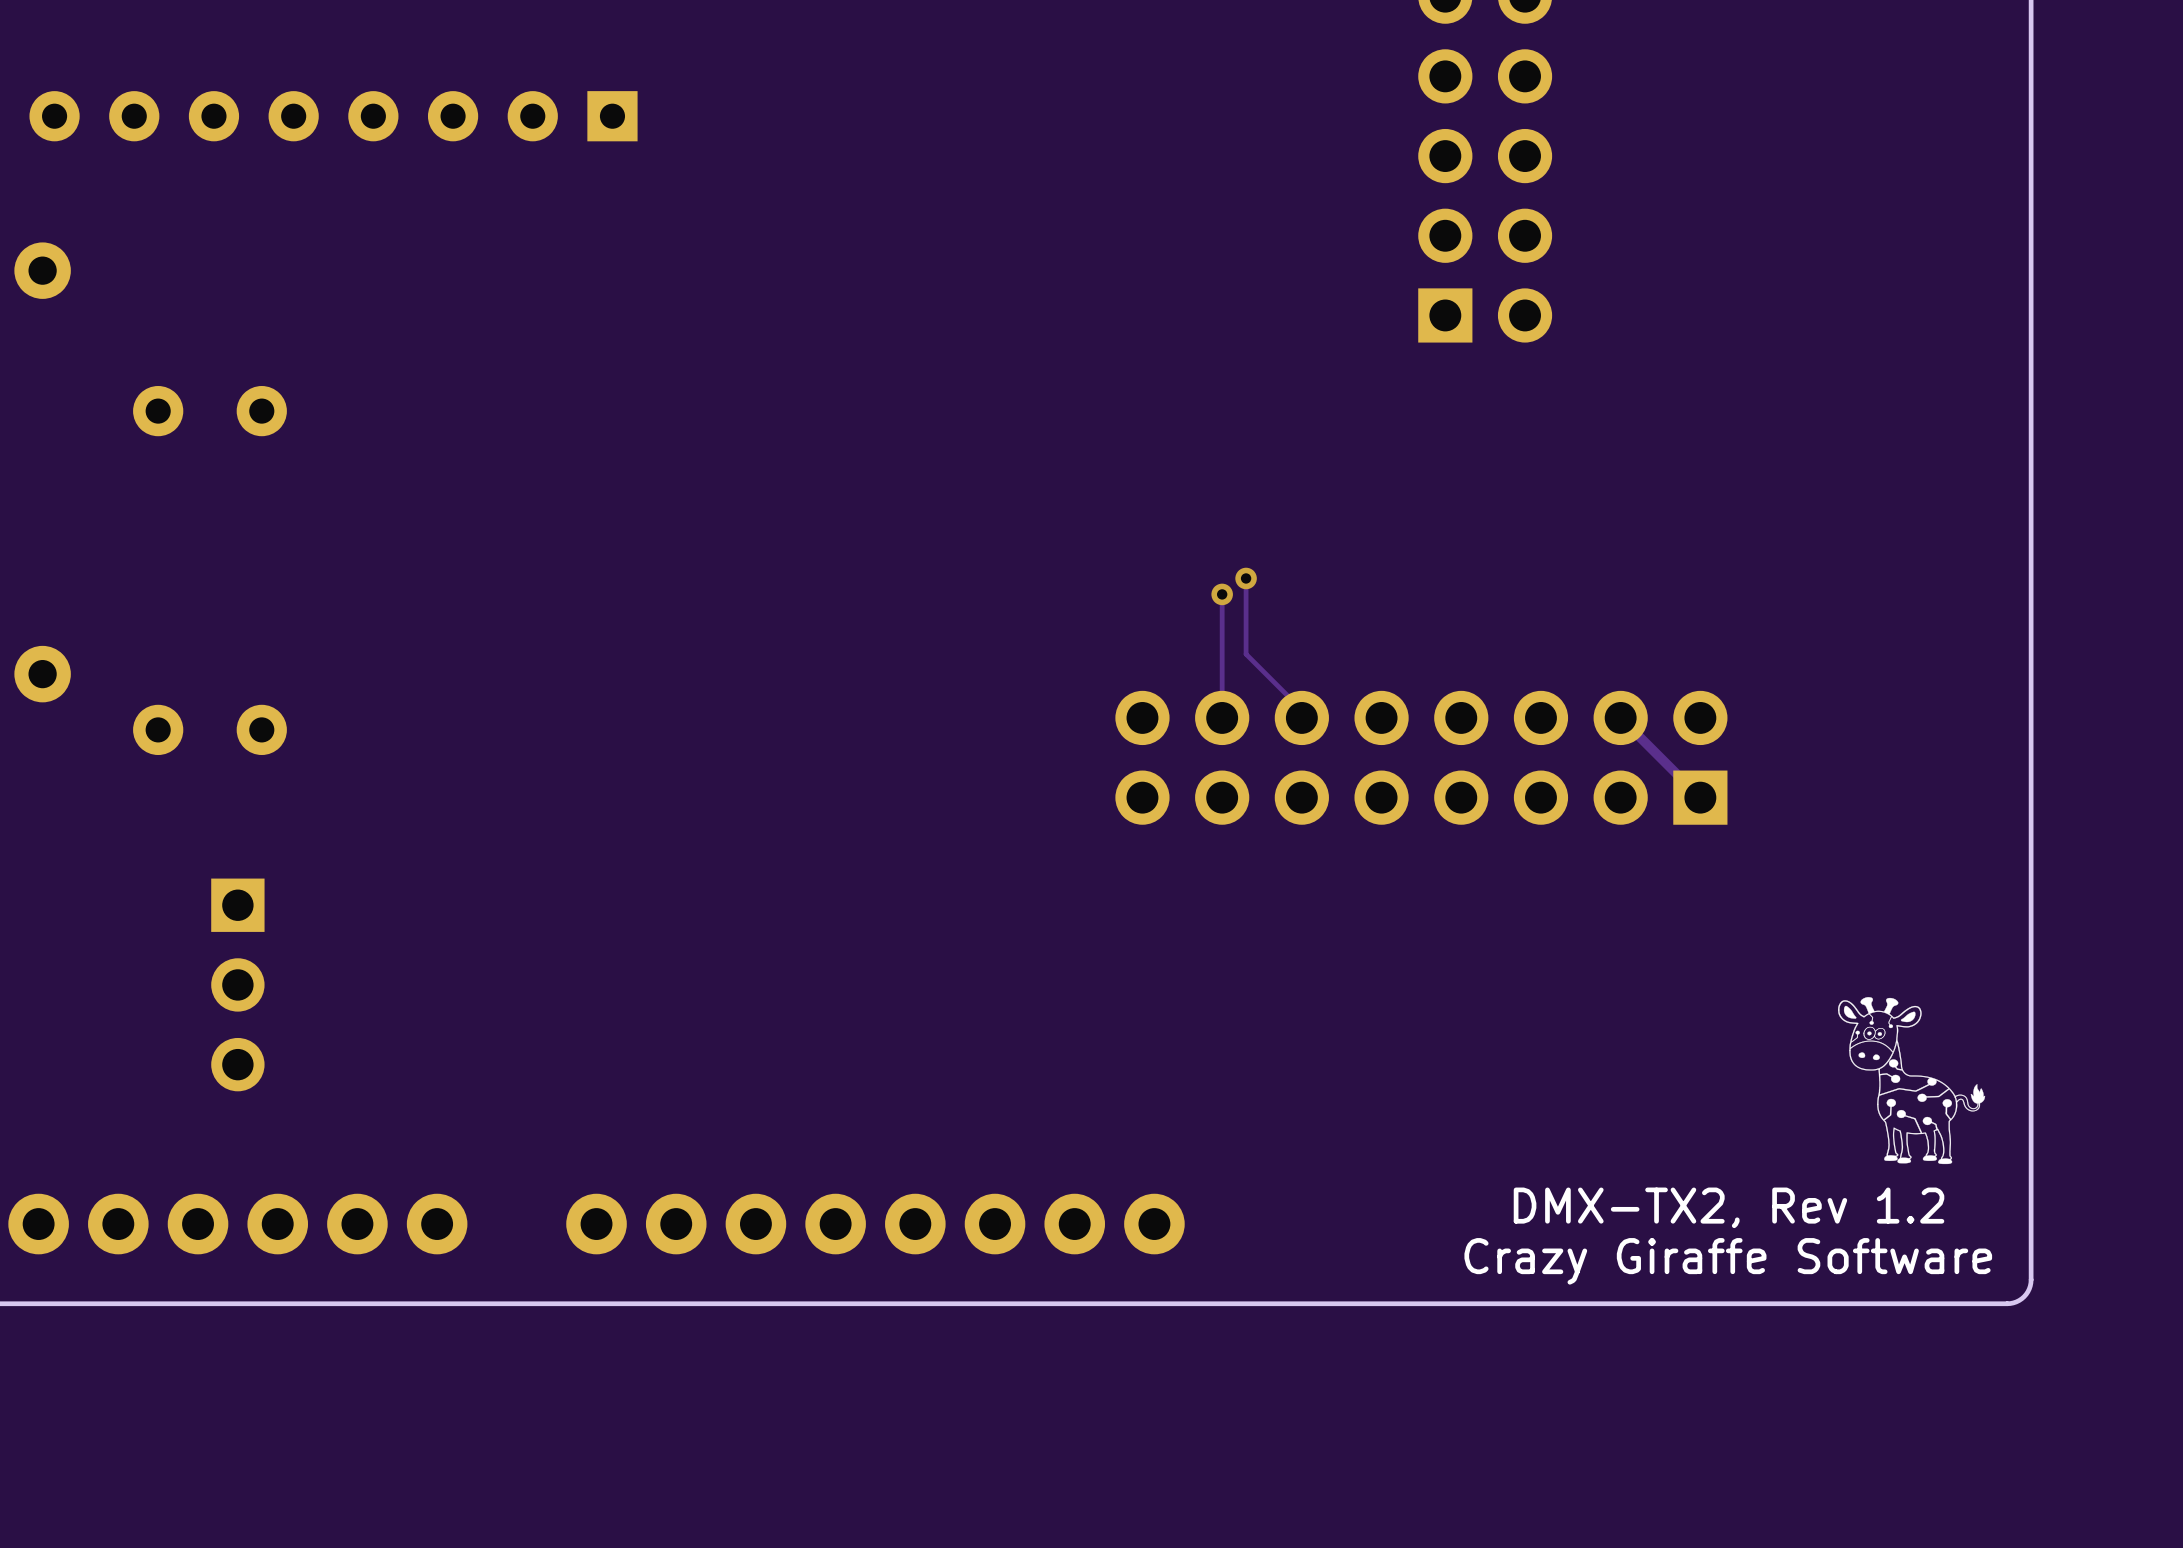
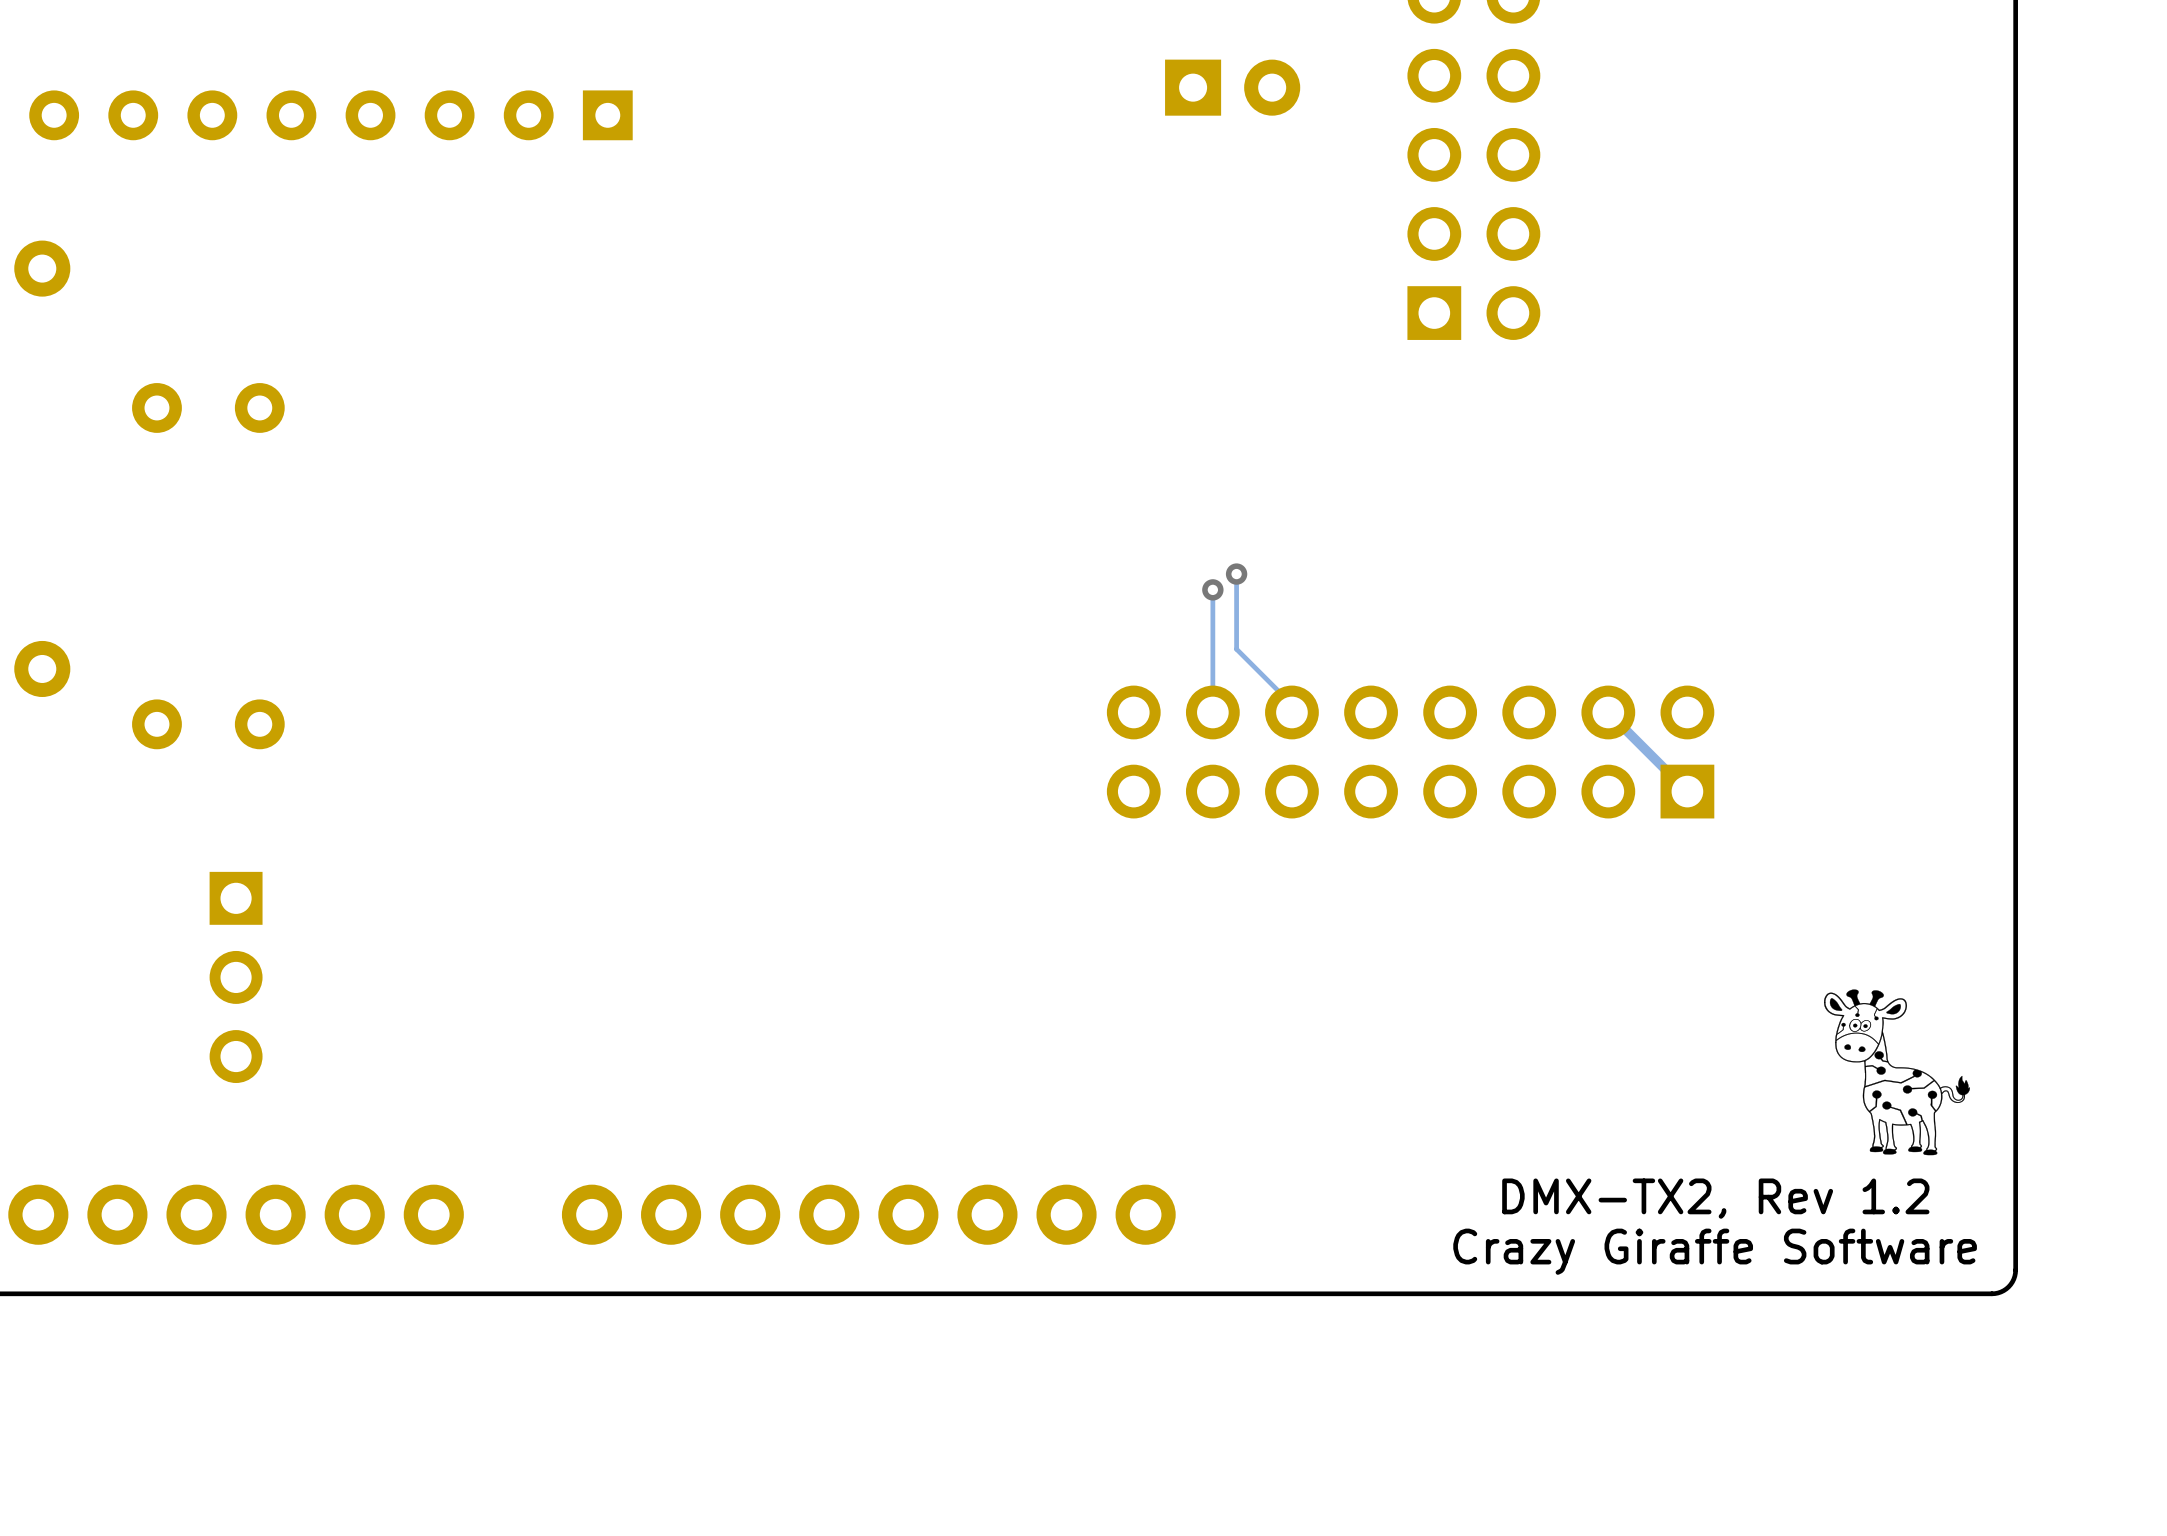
part: none -> (1232, 87)

